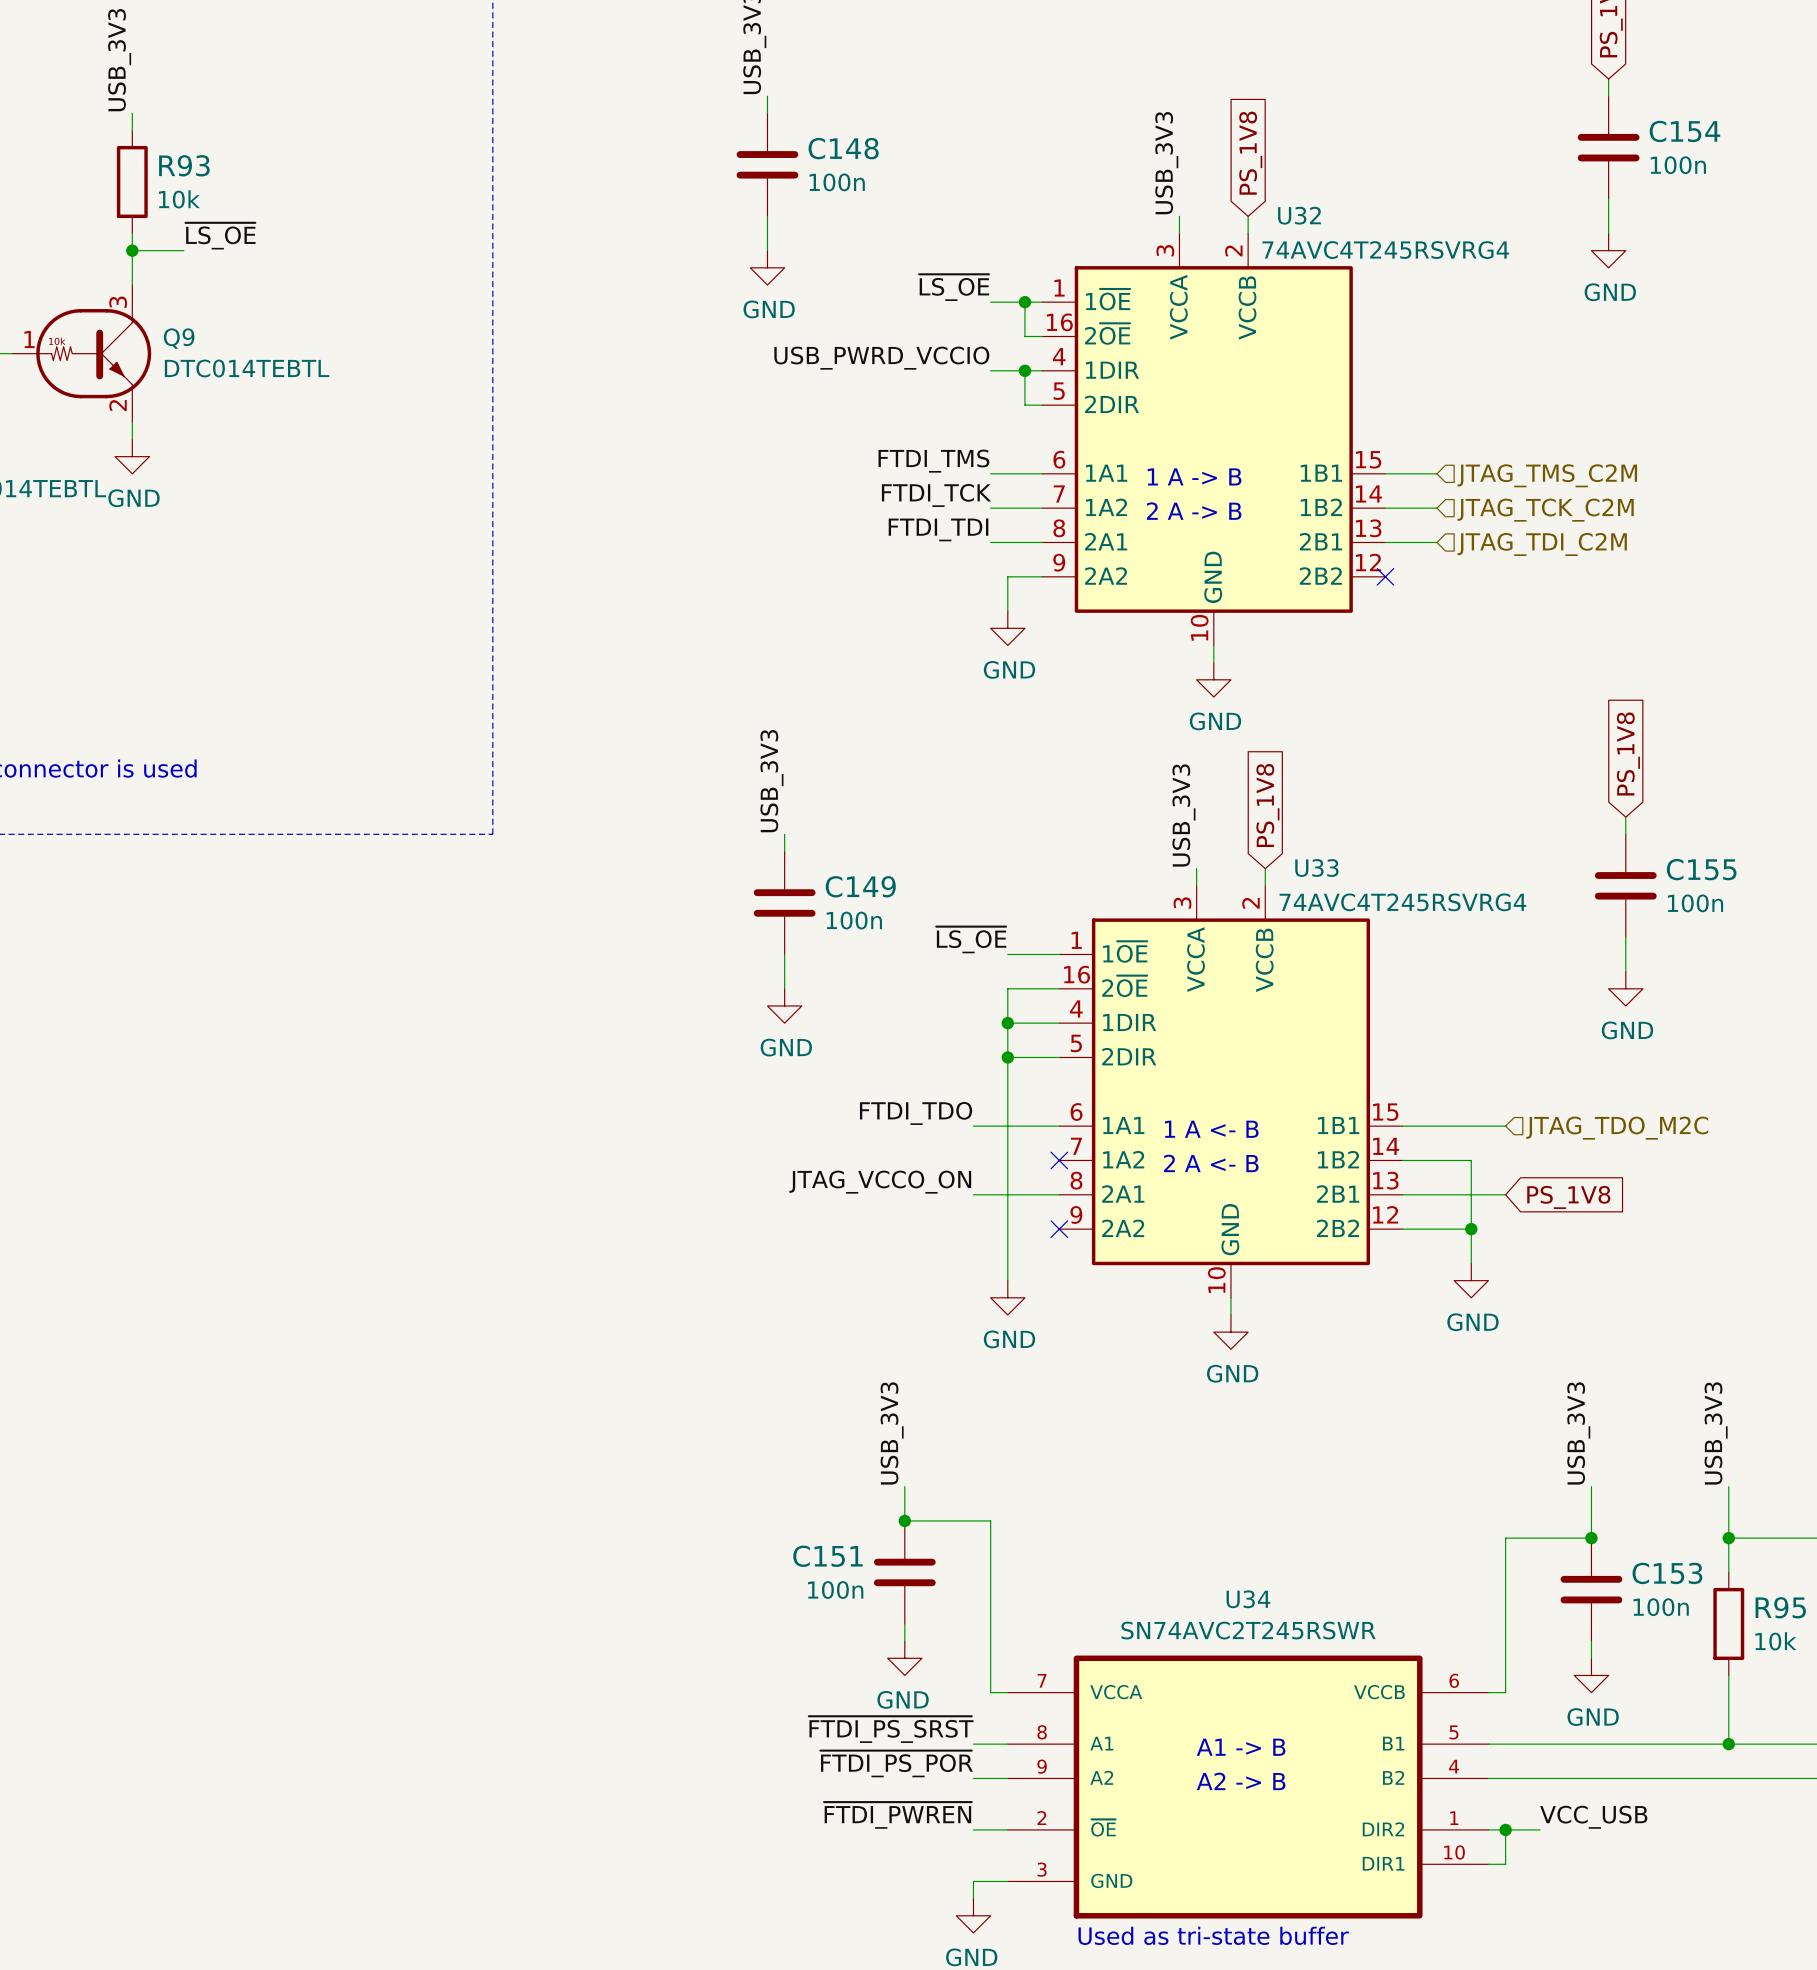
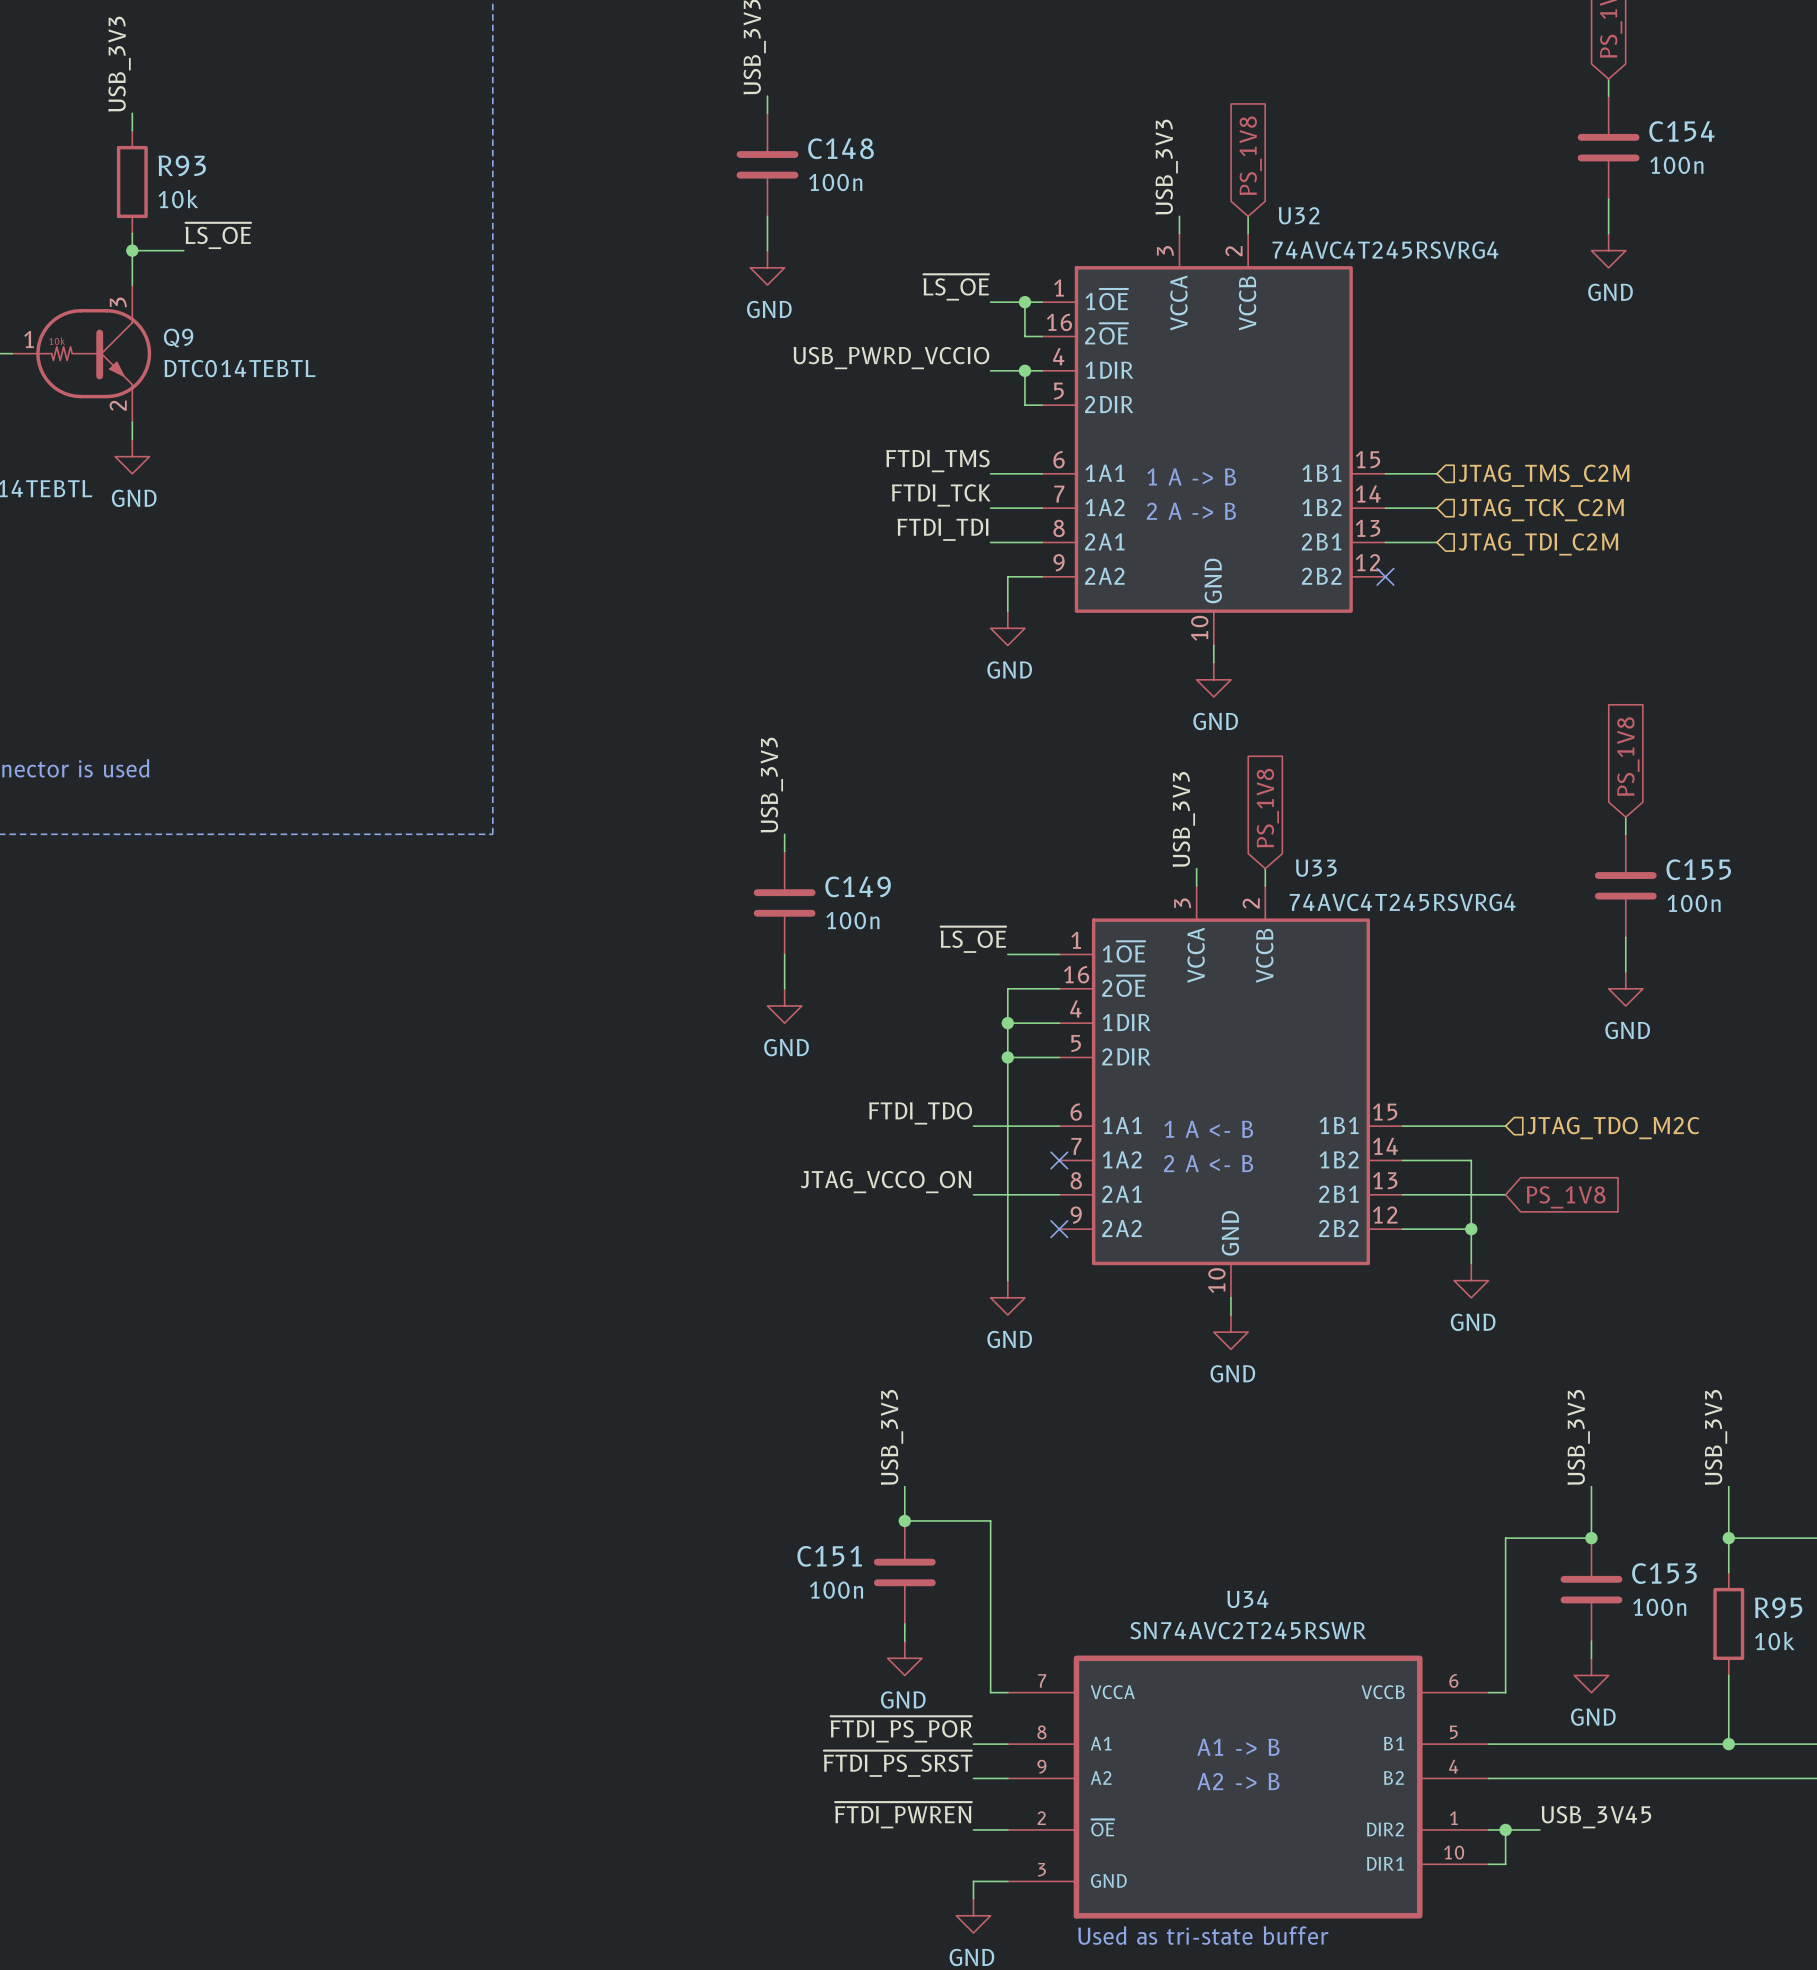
label: ~{FTDI_PS_SRST} (891, 1729) -> ~{FTDI_PS_POR} (901, 1729)
label: ~{FTDI_PS_POR} (896, 1763) -> ~{FTDI_PS_SRST} (898, 1763)
label: VCC_USB (1593, 1817) -> USB_3V45 (1596, 1817)

